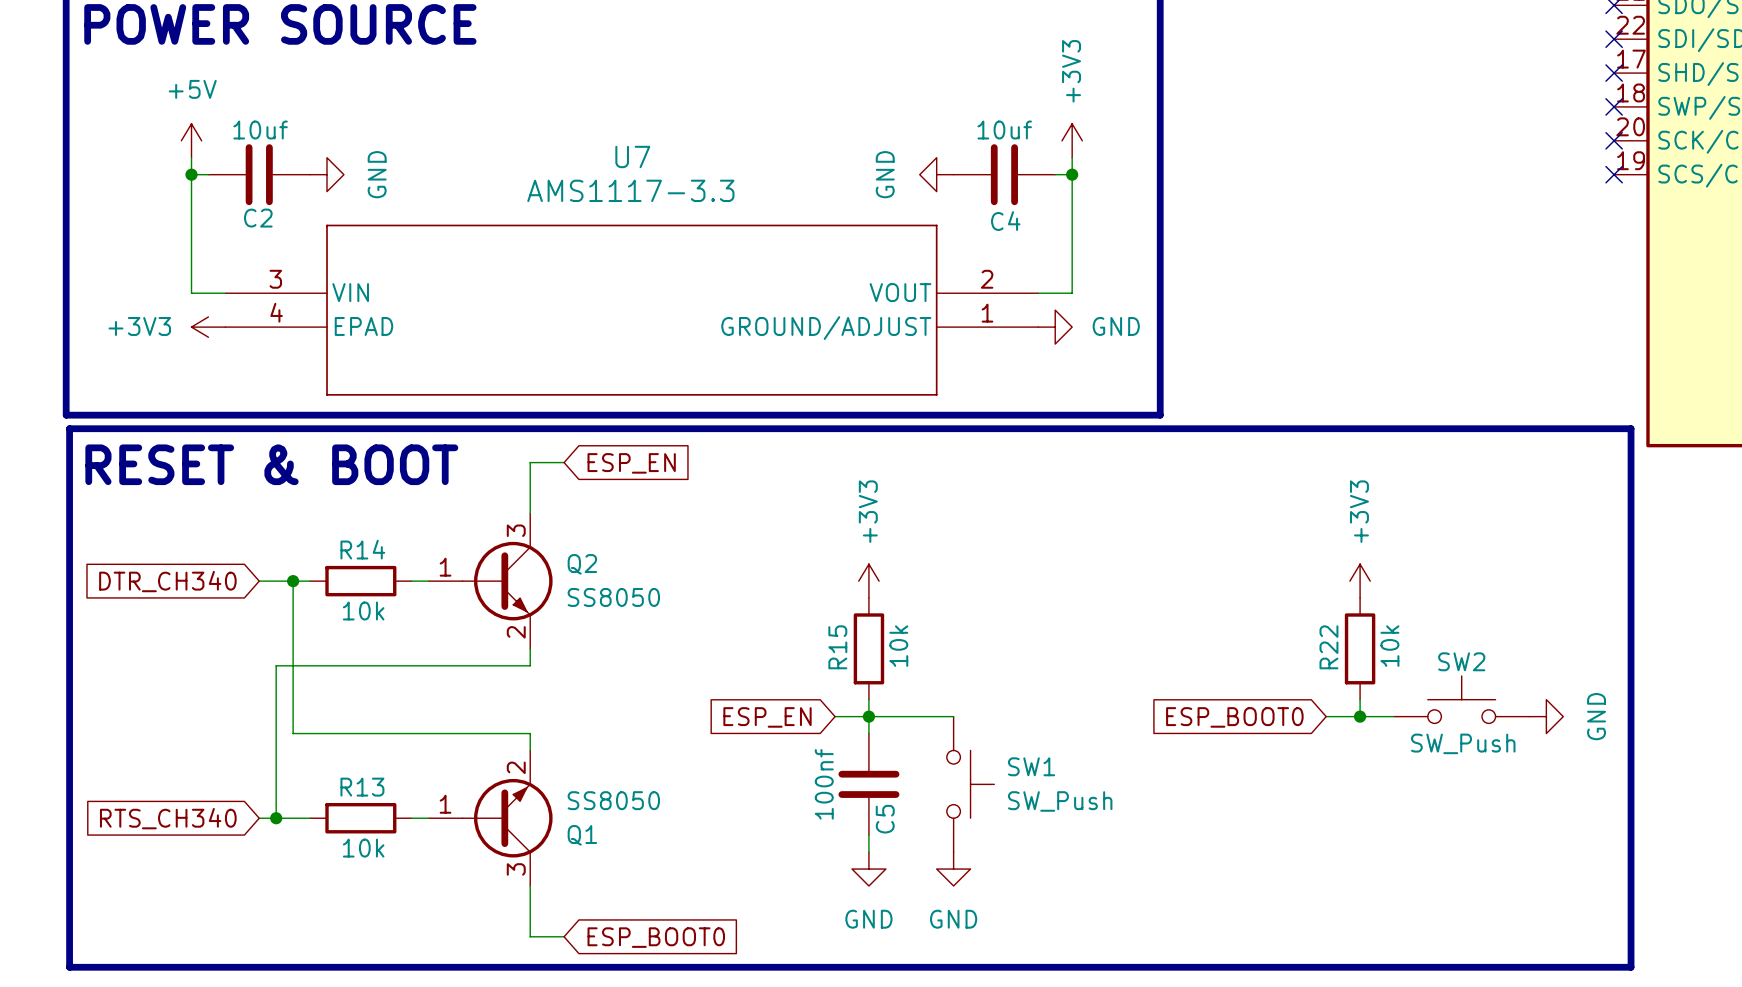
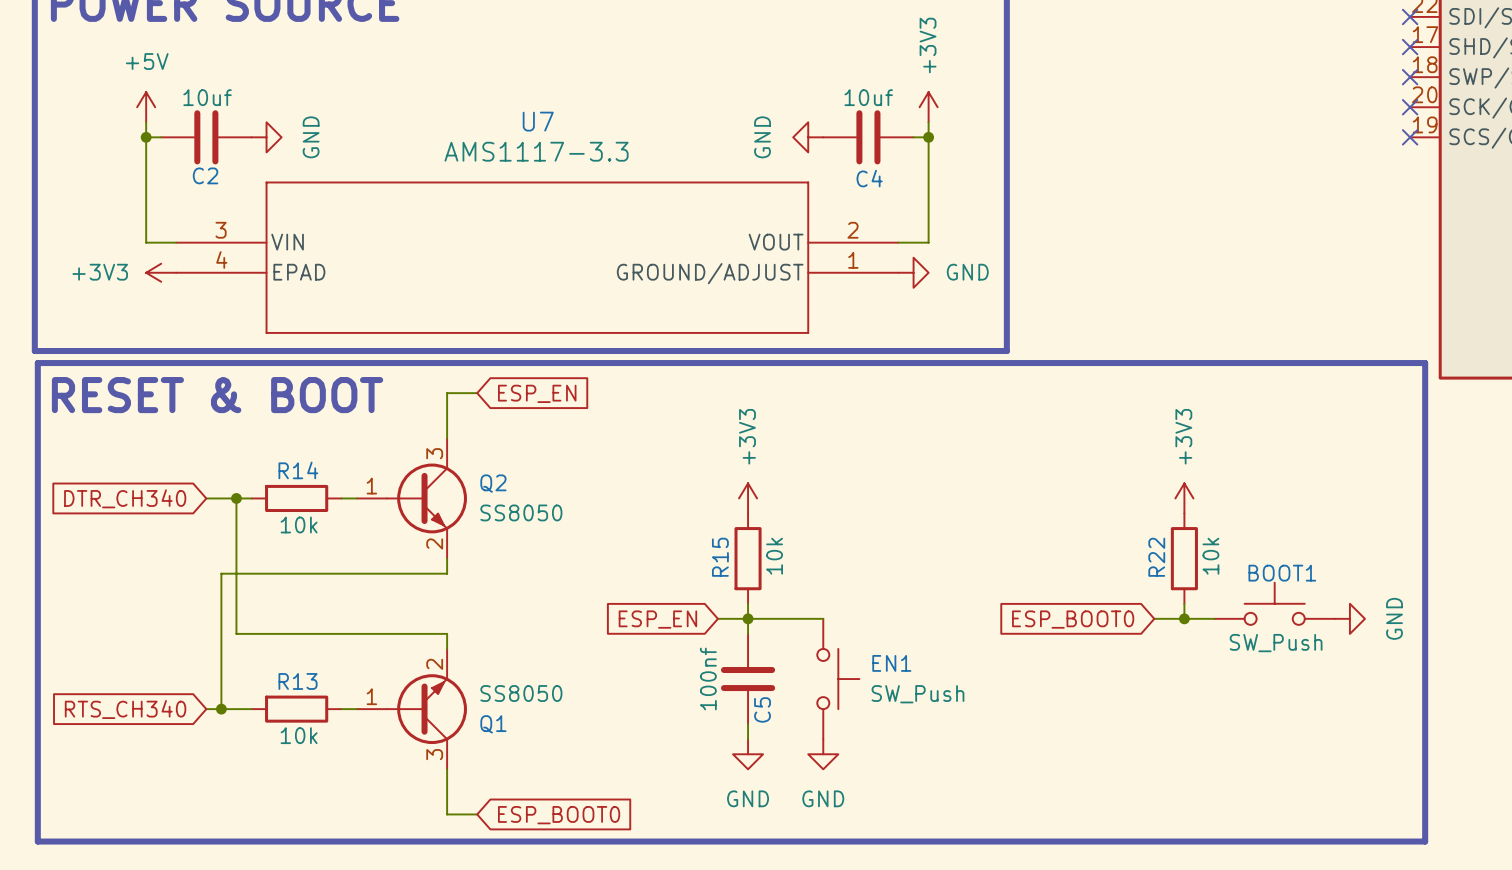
SW2 name: SW2 (1461, 661) -> BOOT1 (1282, 573)
SW1 name: SW1 (1031, 766) -> EN1 (891, 663)

